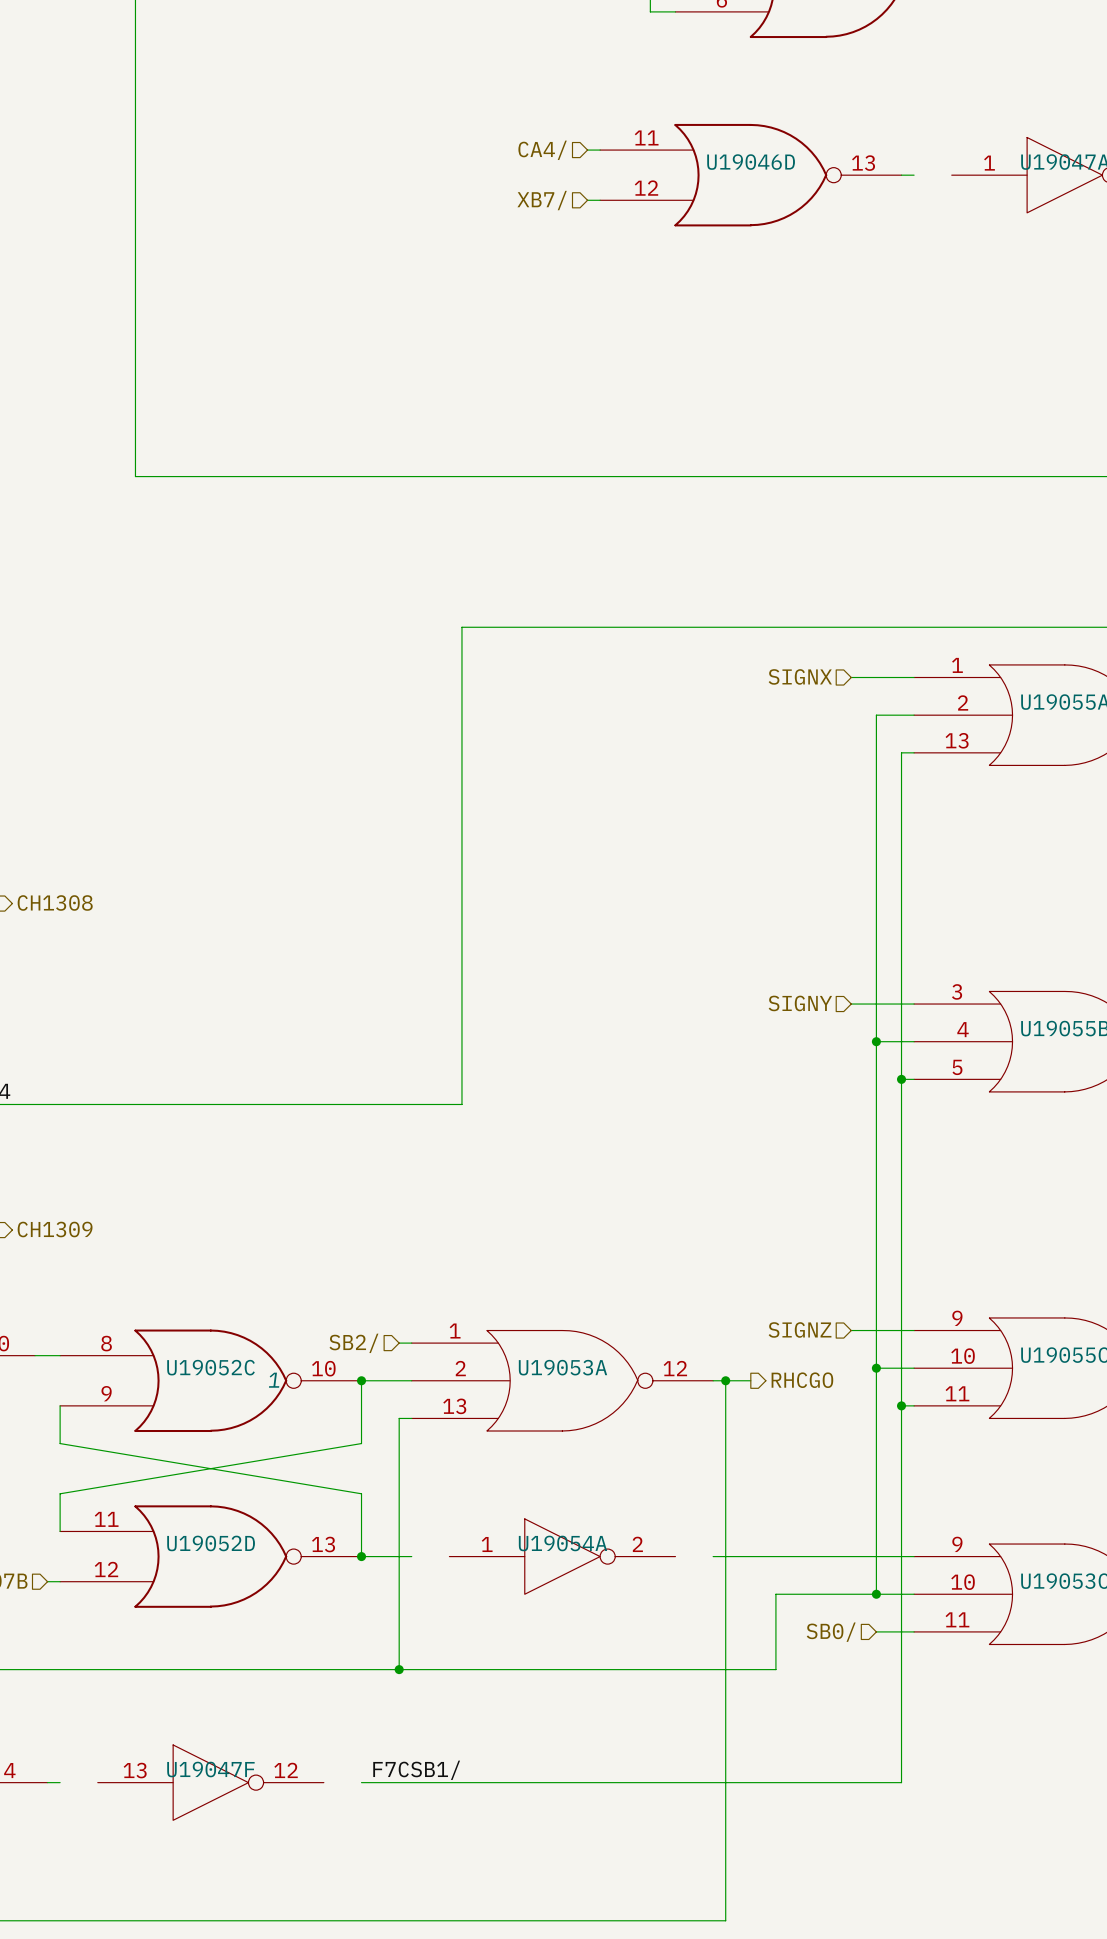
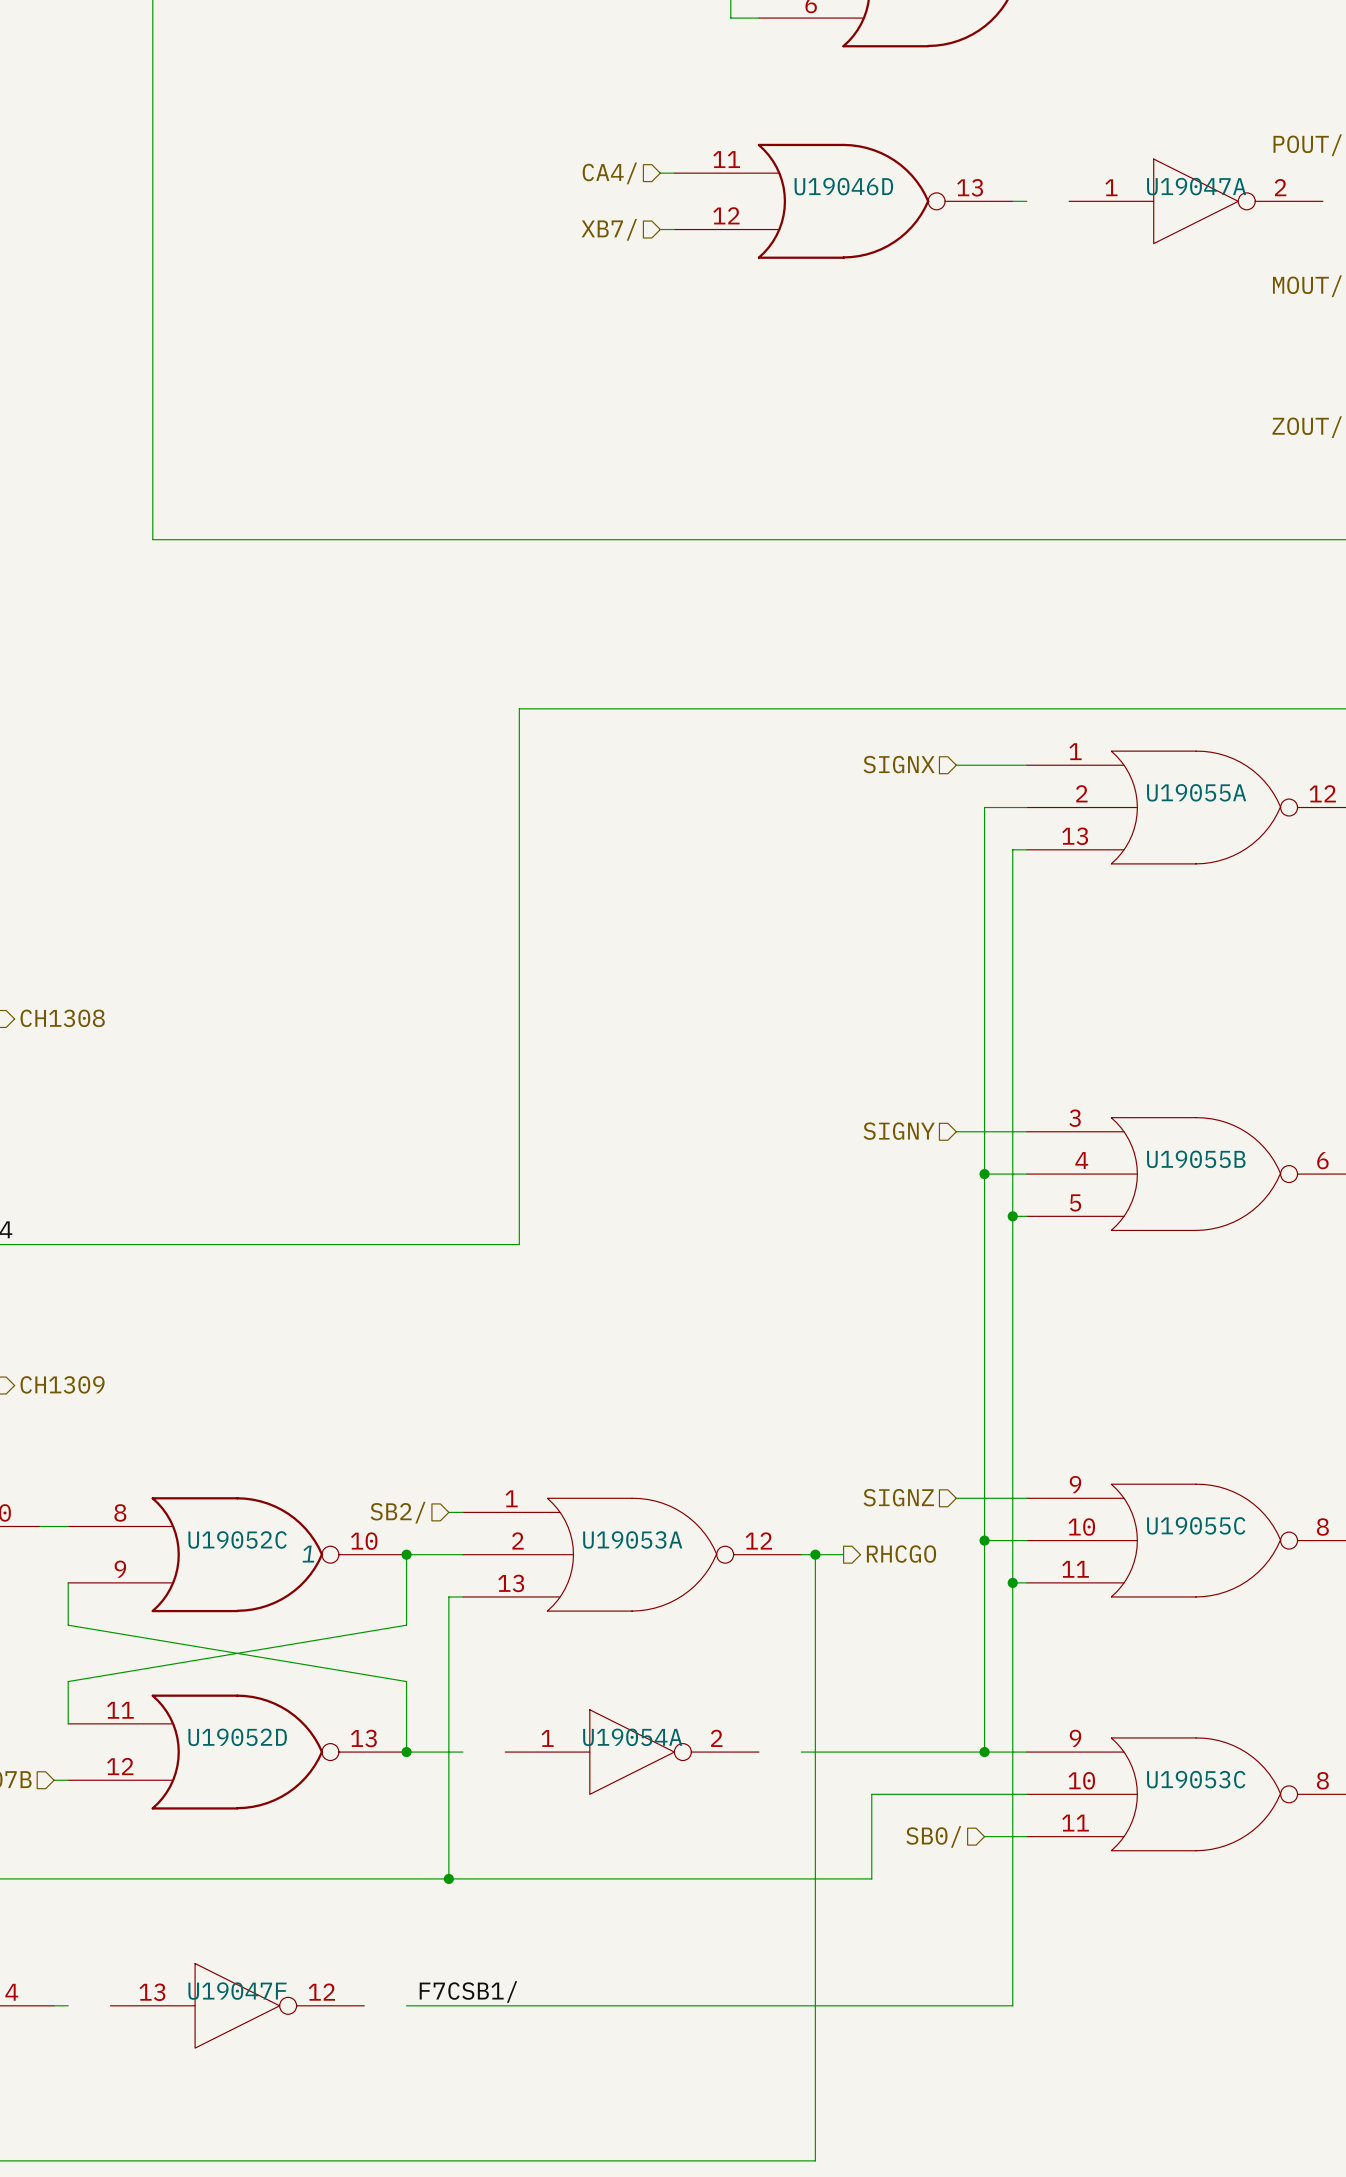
wire: (876, 1556) (876, 1594) -> none
junction position: (876, 1594) -> (984, 1752)

